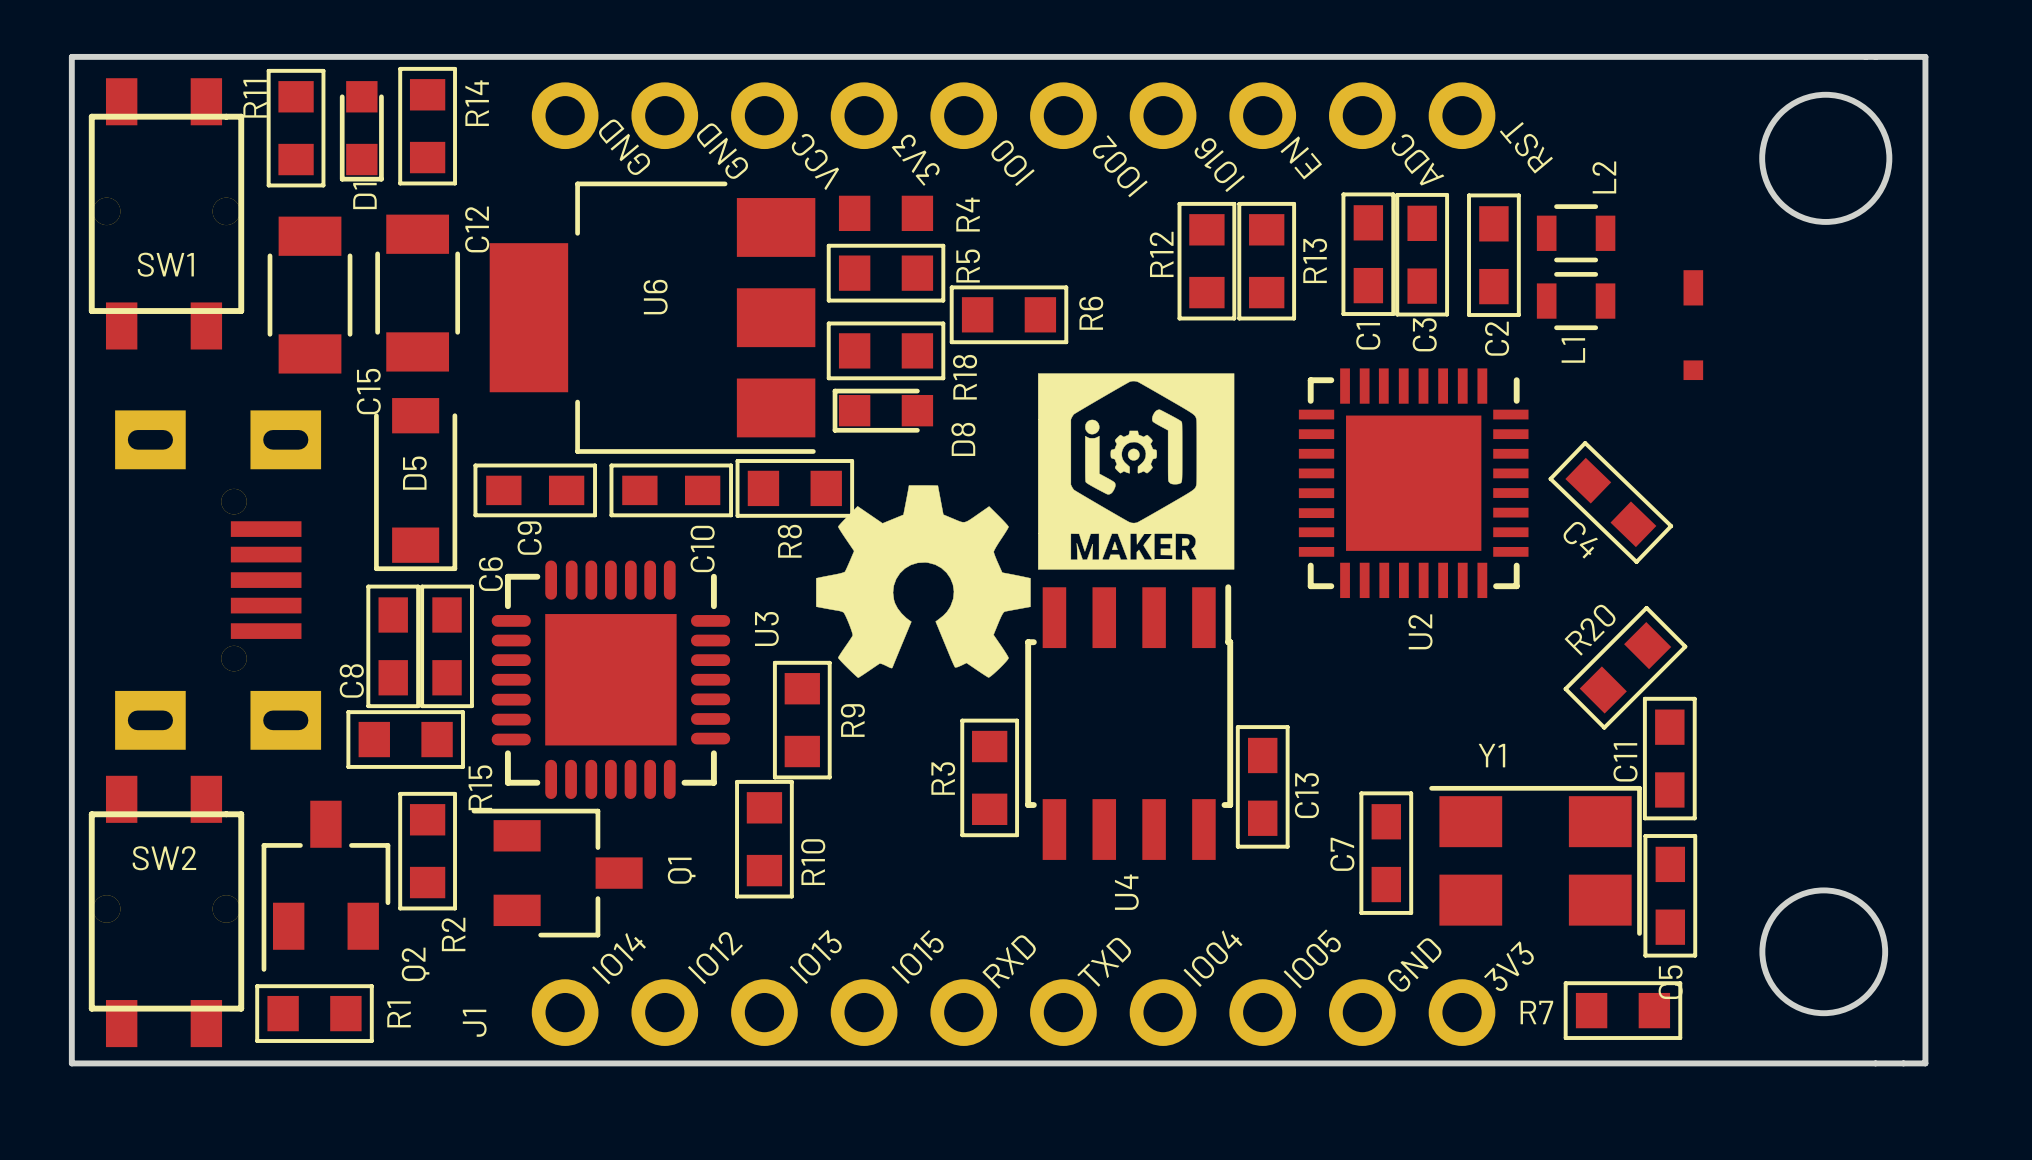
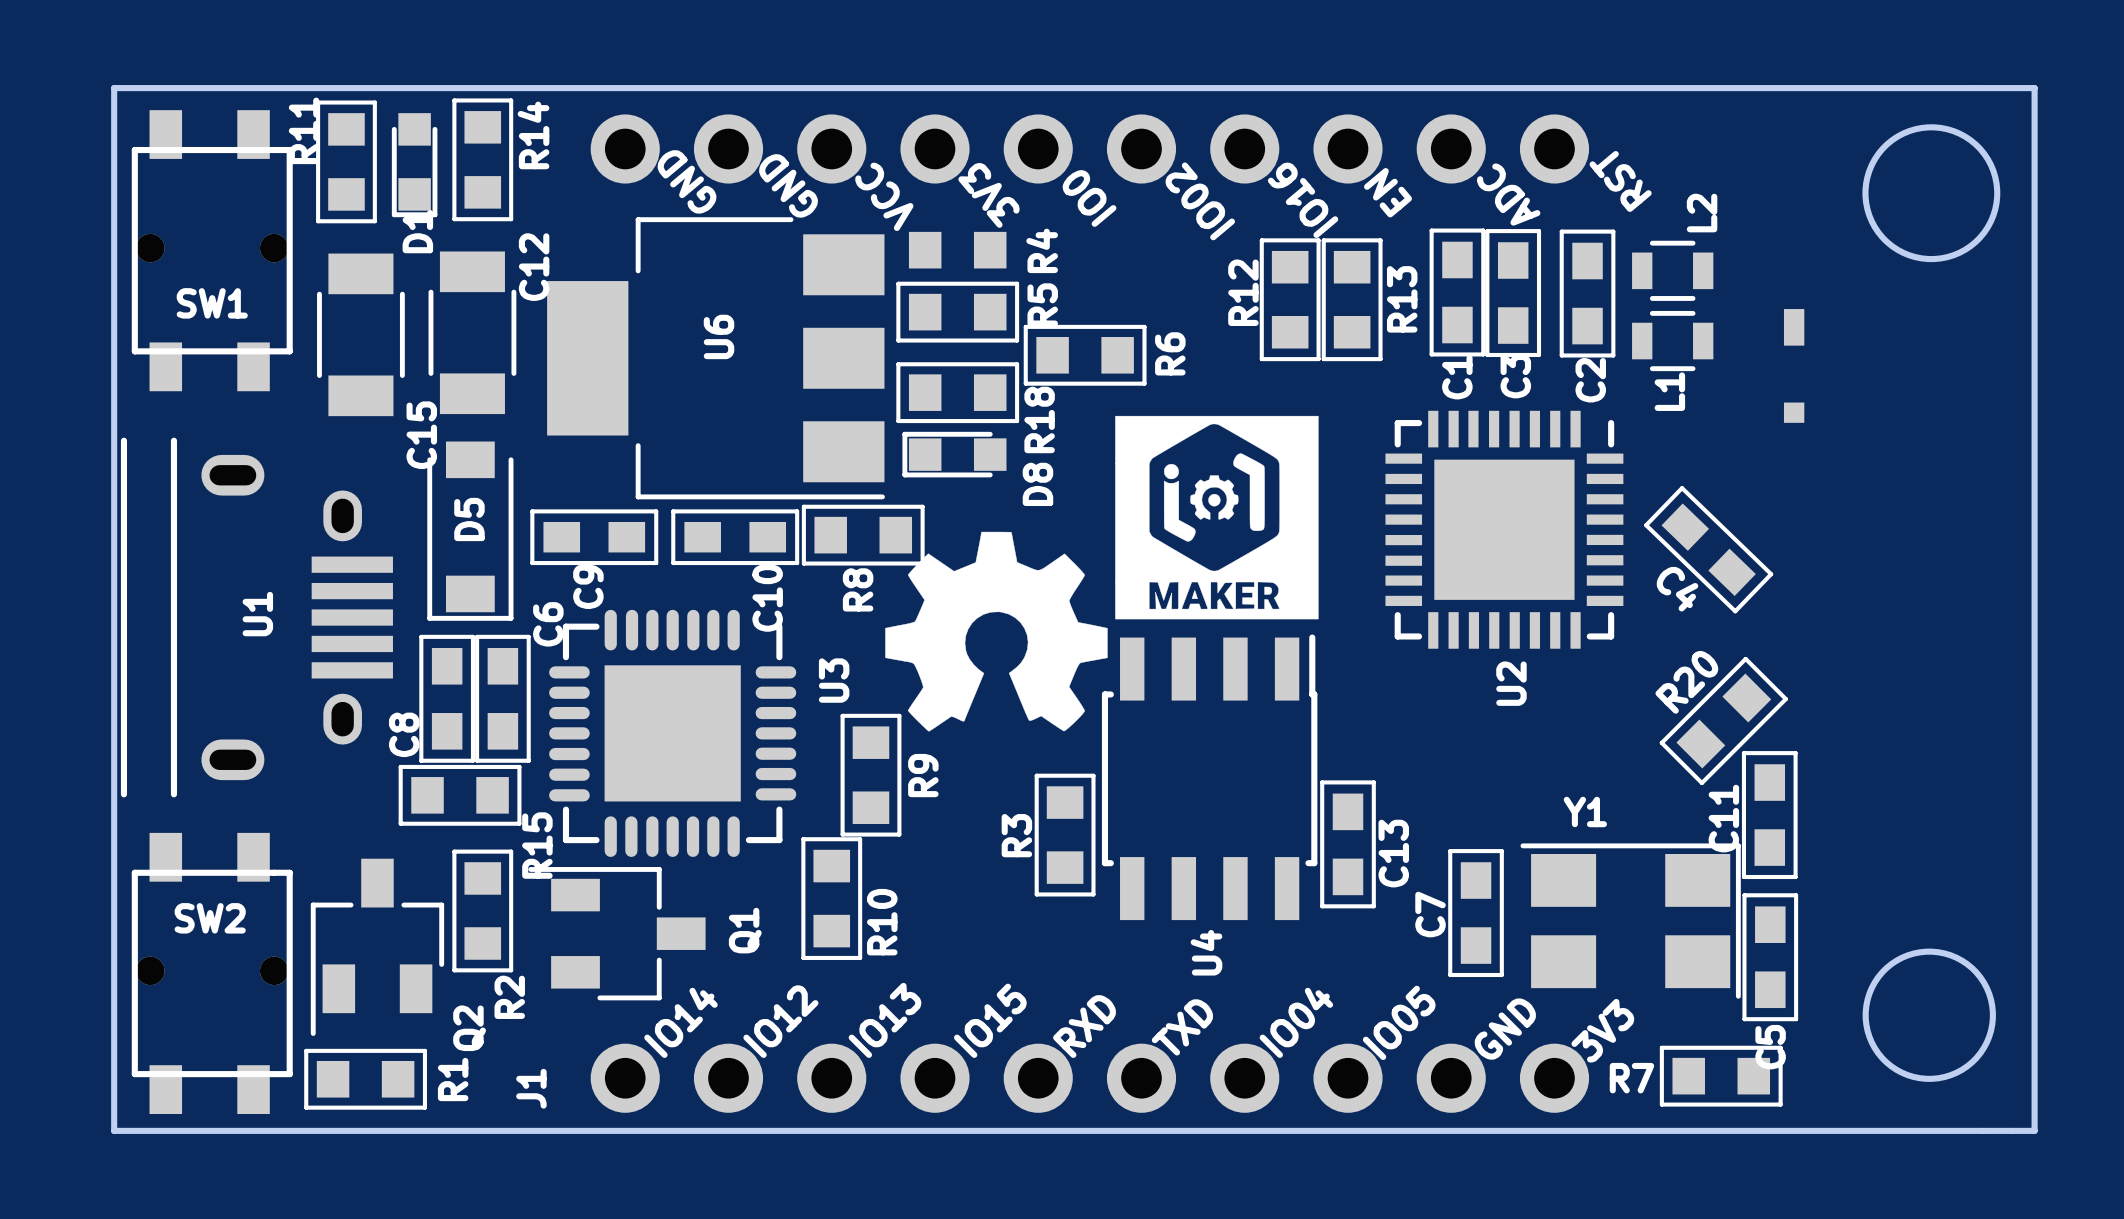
U1: none -> (256, 617)
part: (218, 580) -> none

